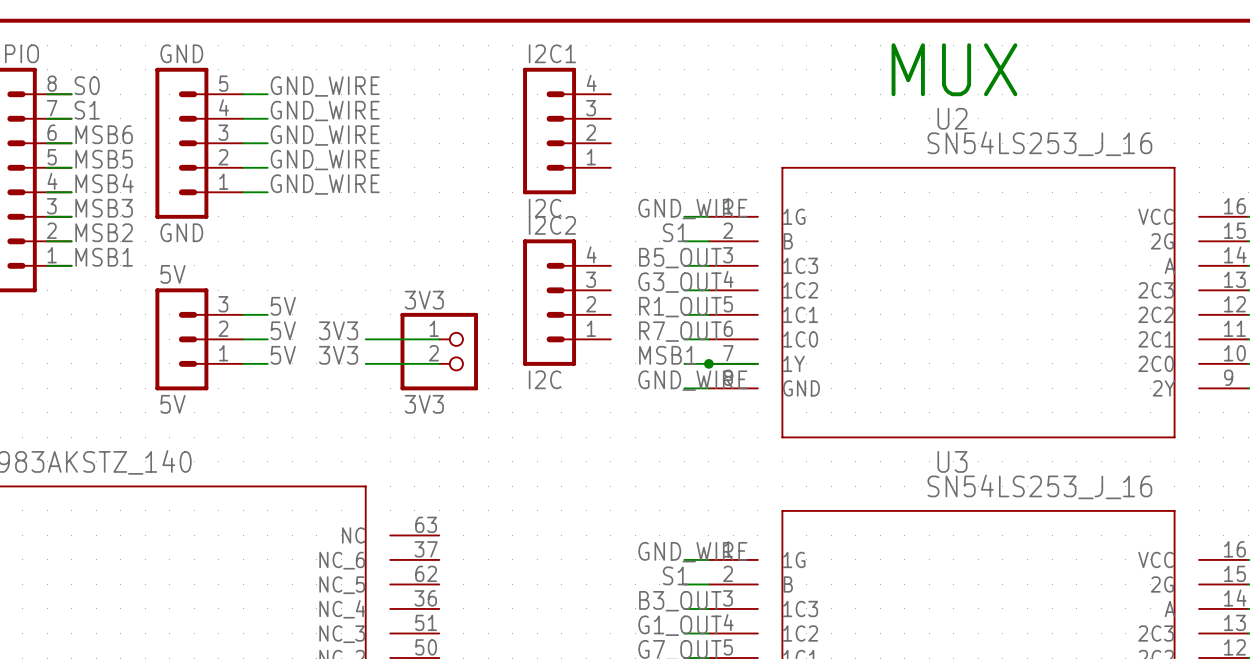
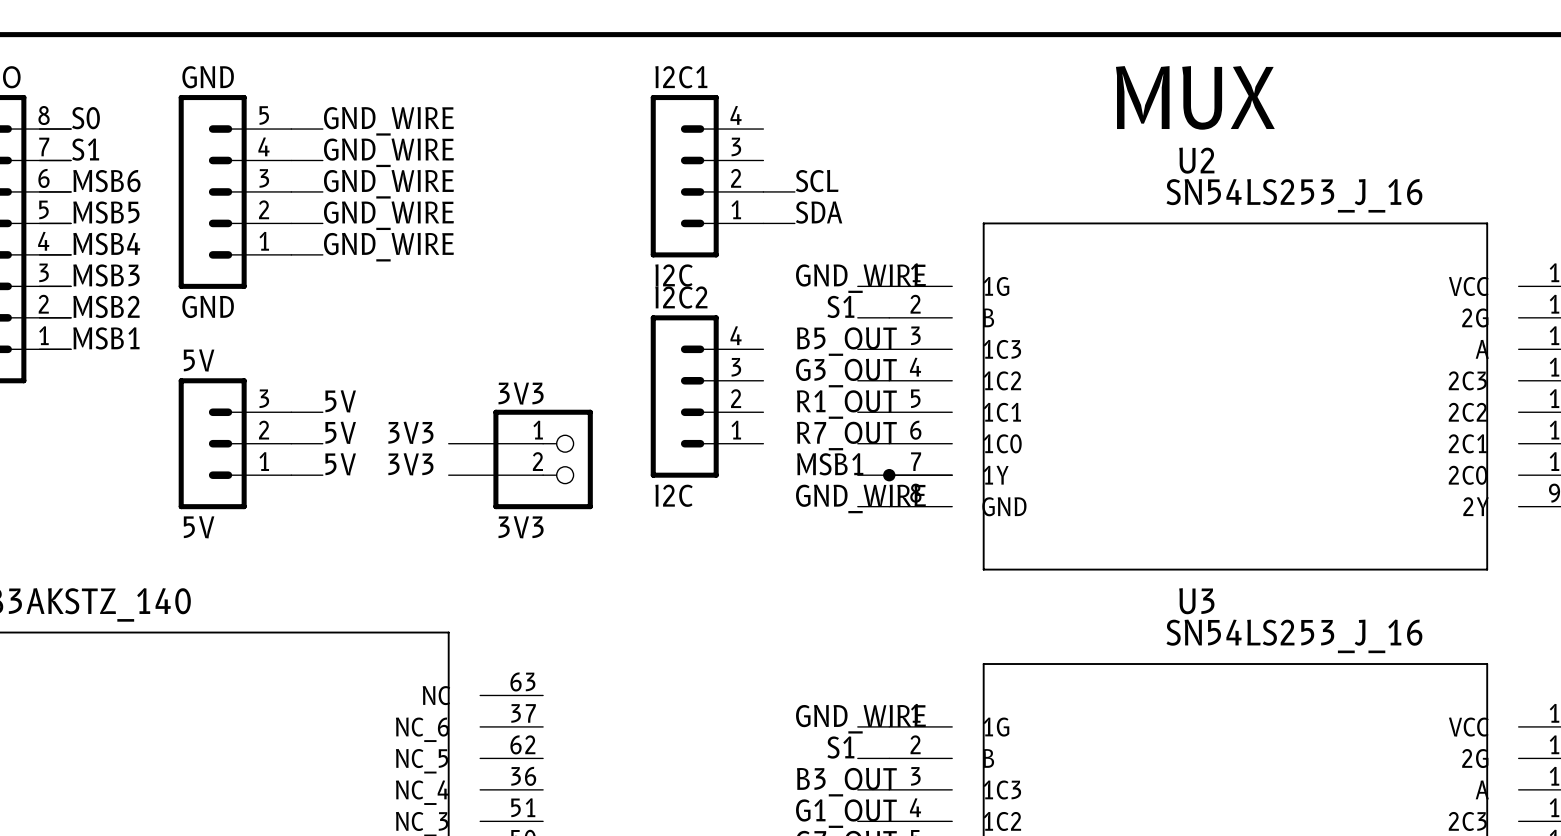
label: none -> SCL (817, 181)
wire: none -> (763, 191) (794, 191)
label: none -> SDA (819, 212)
wire: none -> (763, 223) (794, 223)

